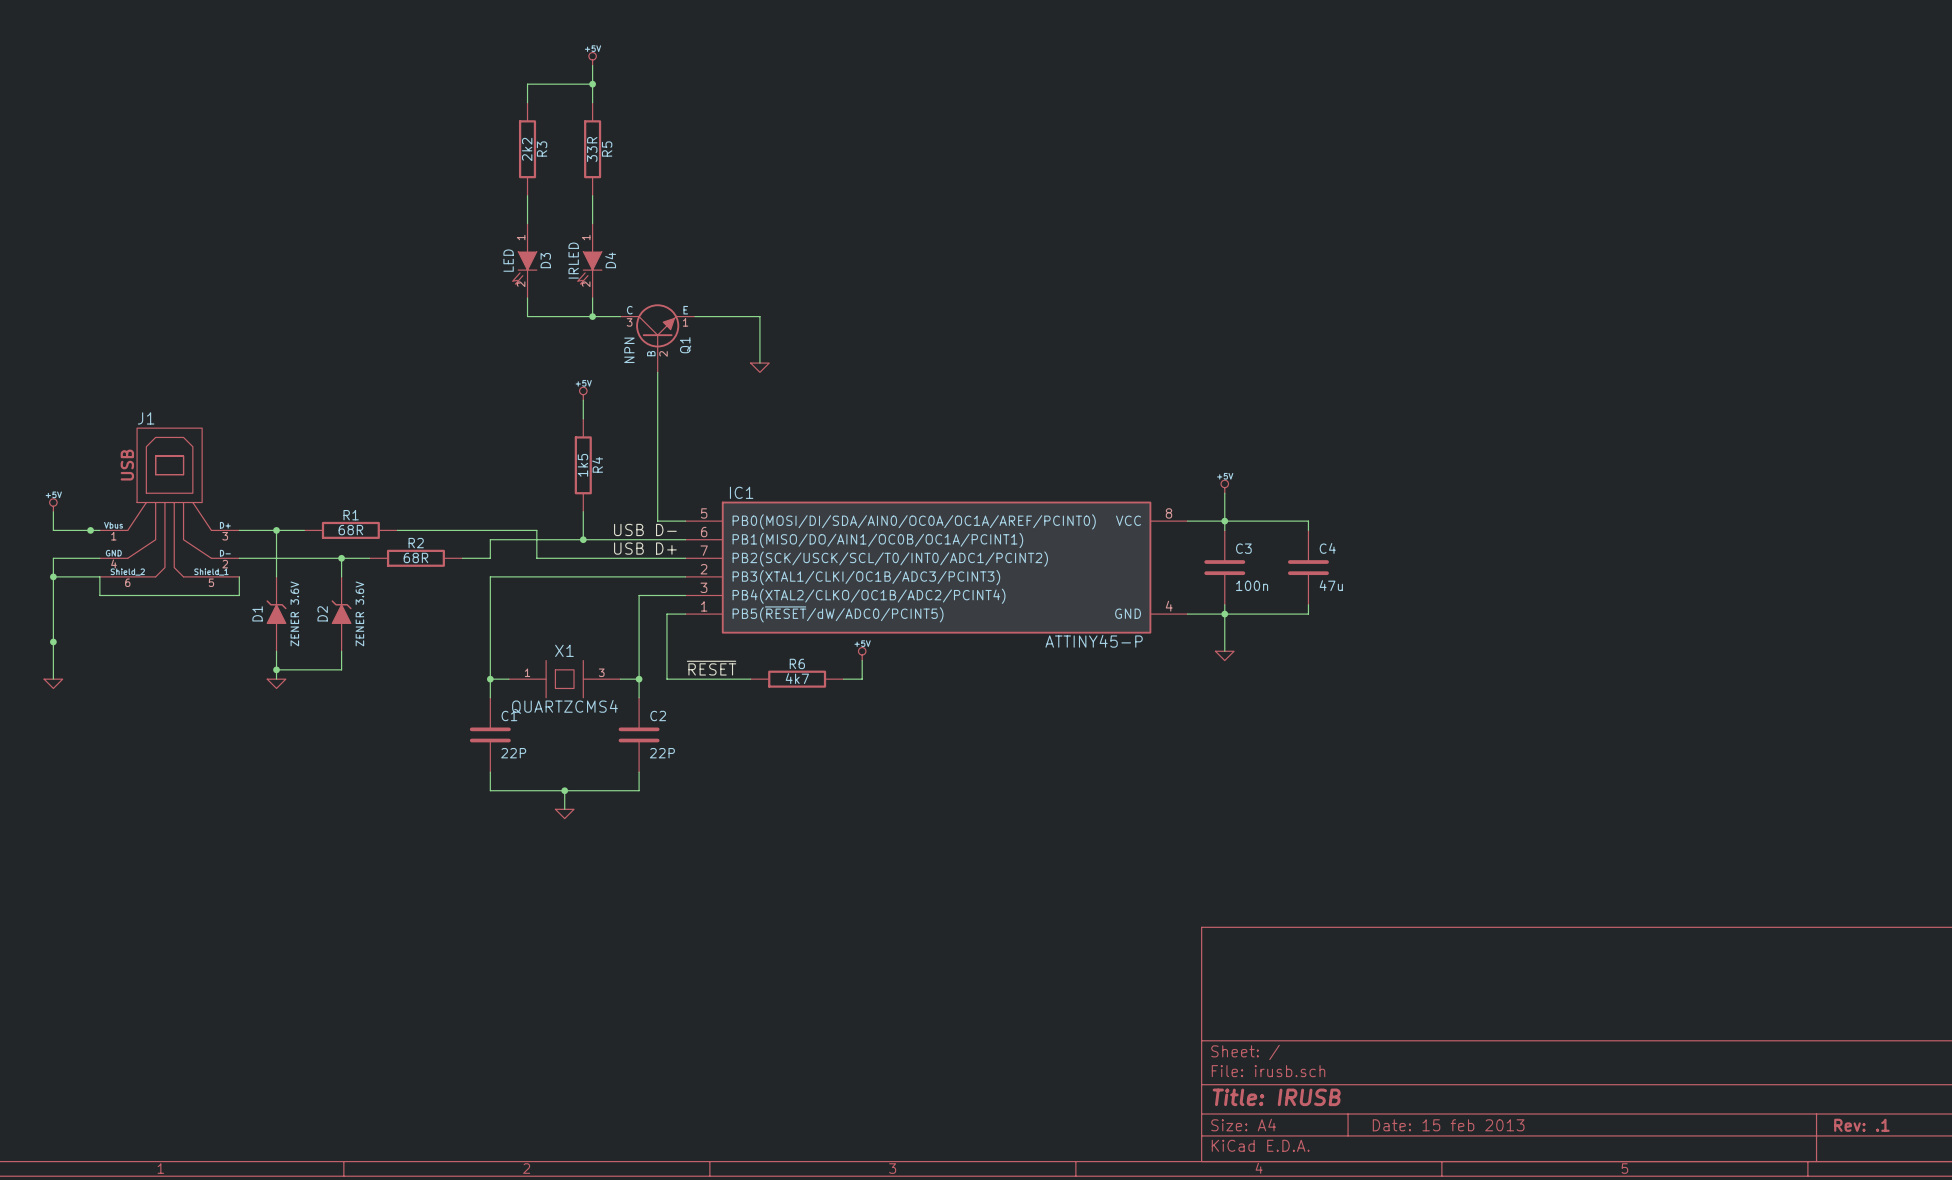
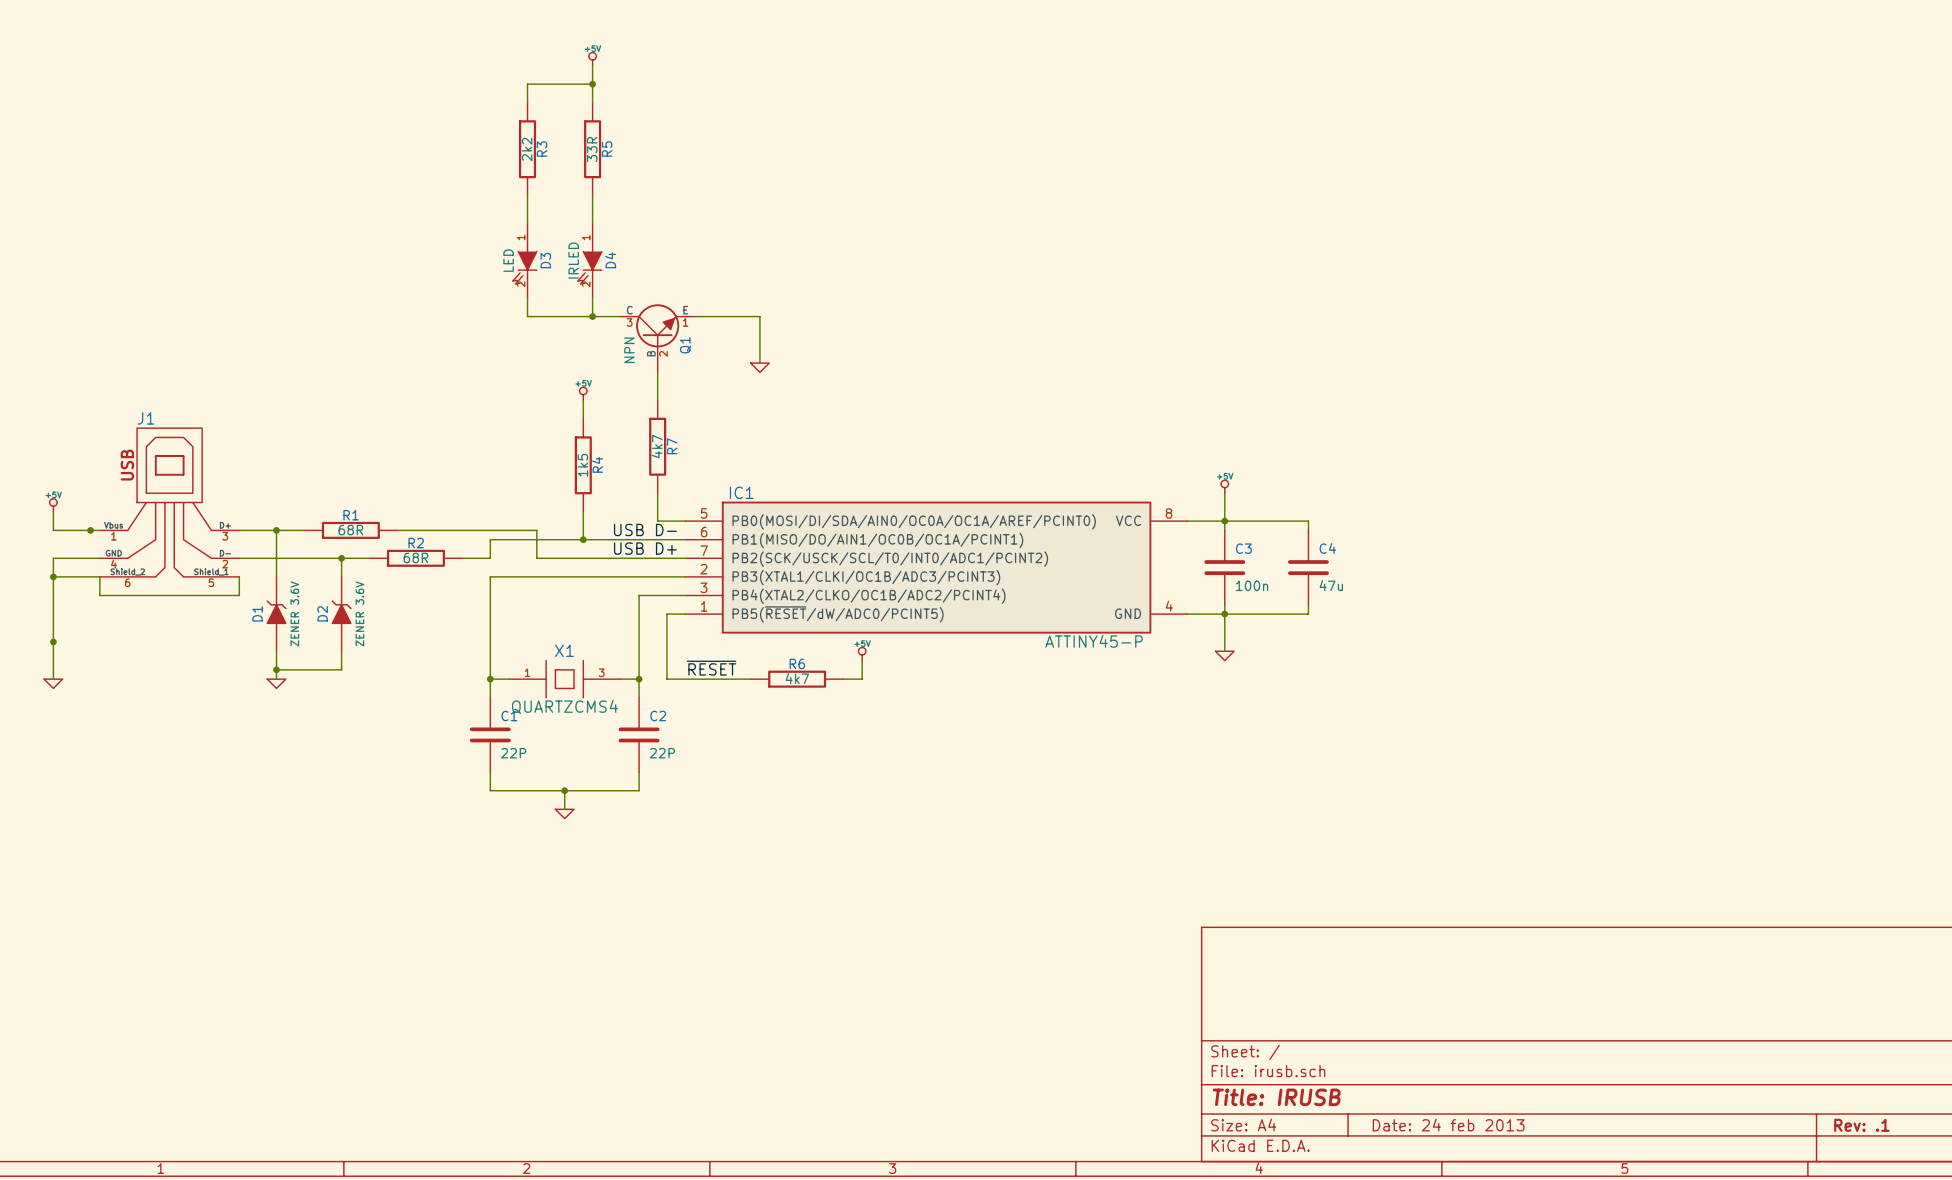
wire: (657, 400) (657, 493) -> none
R7: none -> 4k7 (657, 446)
title block: Date: 15 feb 2013 (1448, 1125) -> Date: 24 feb 2013 (1448, 1125)

